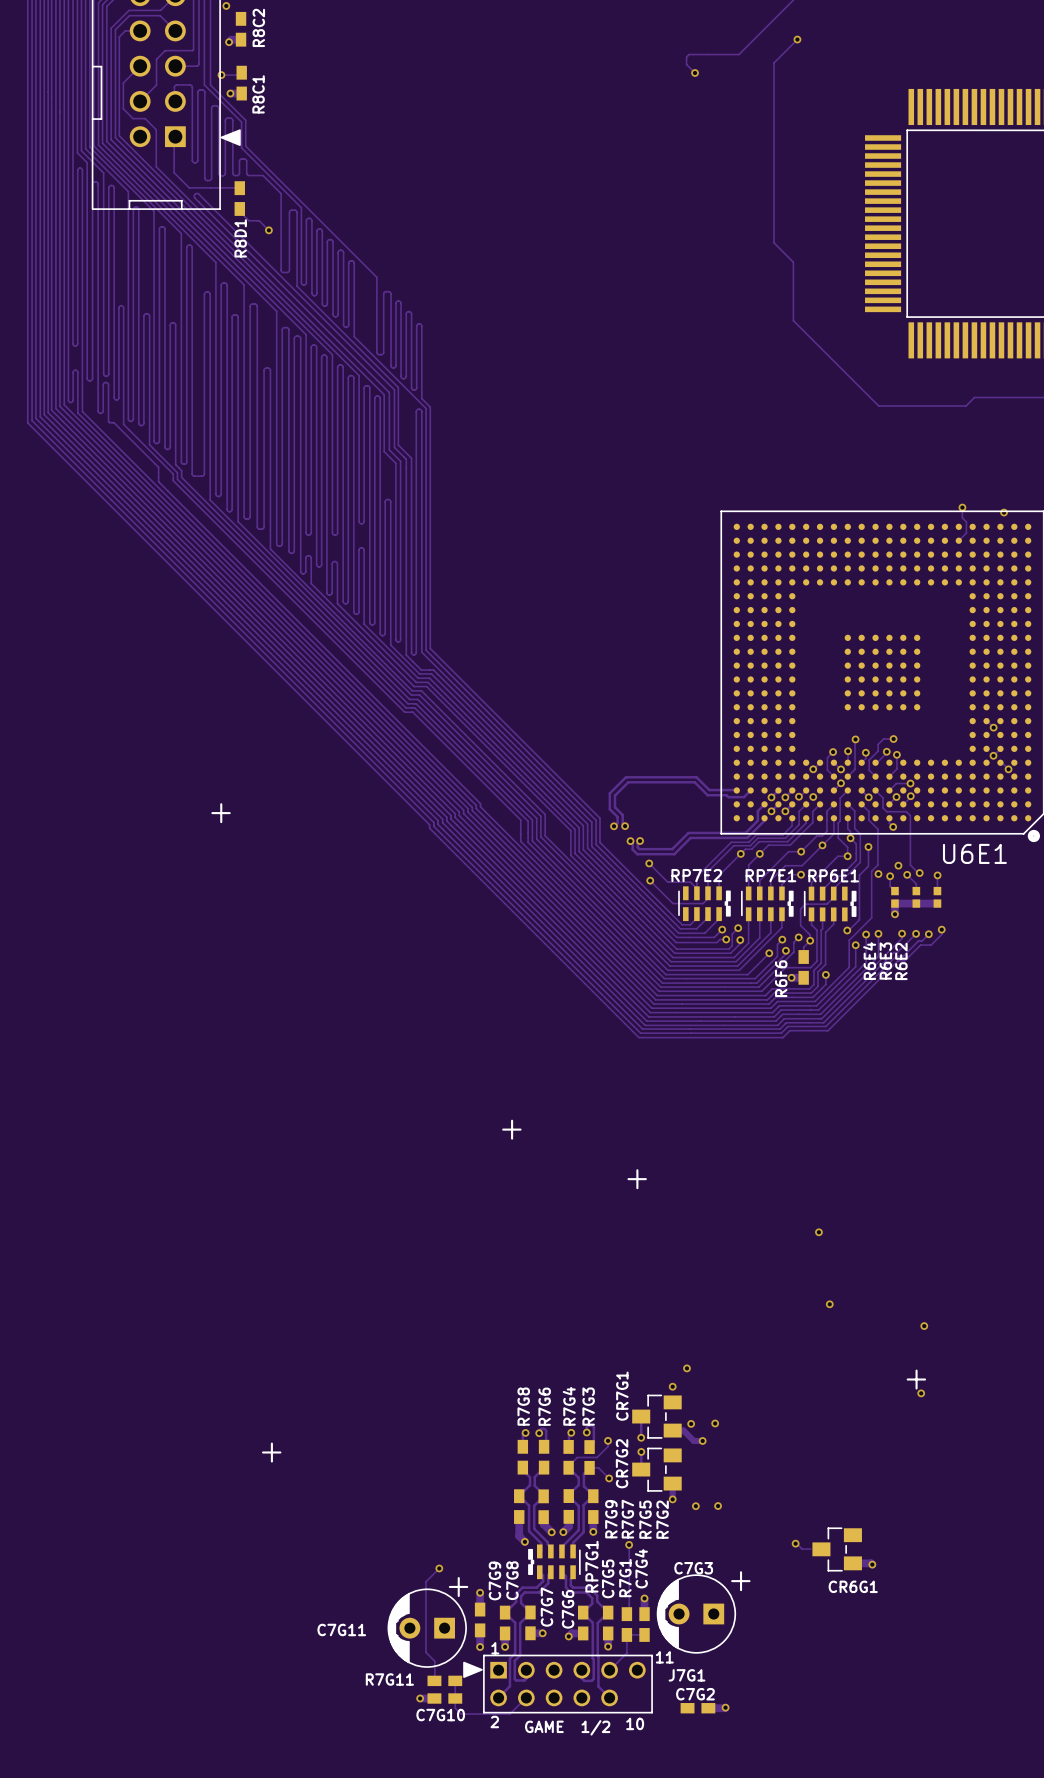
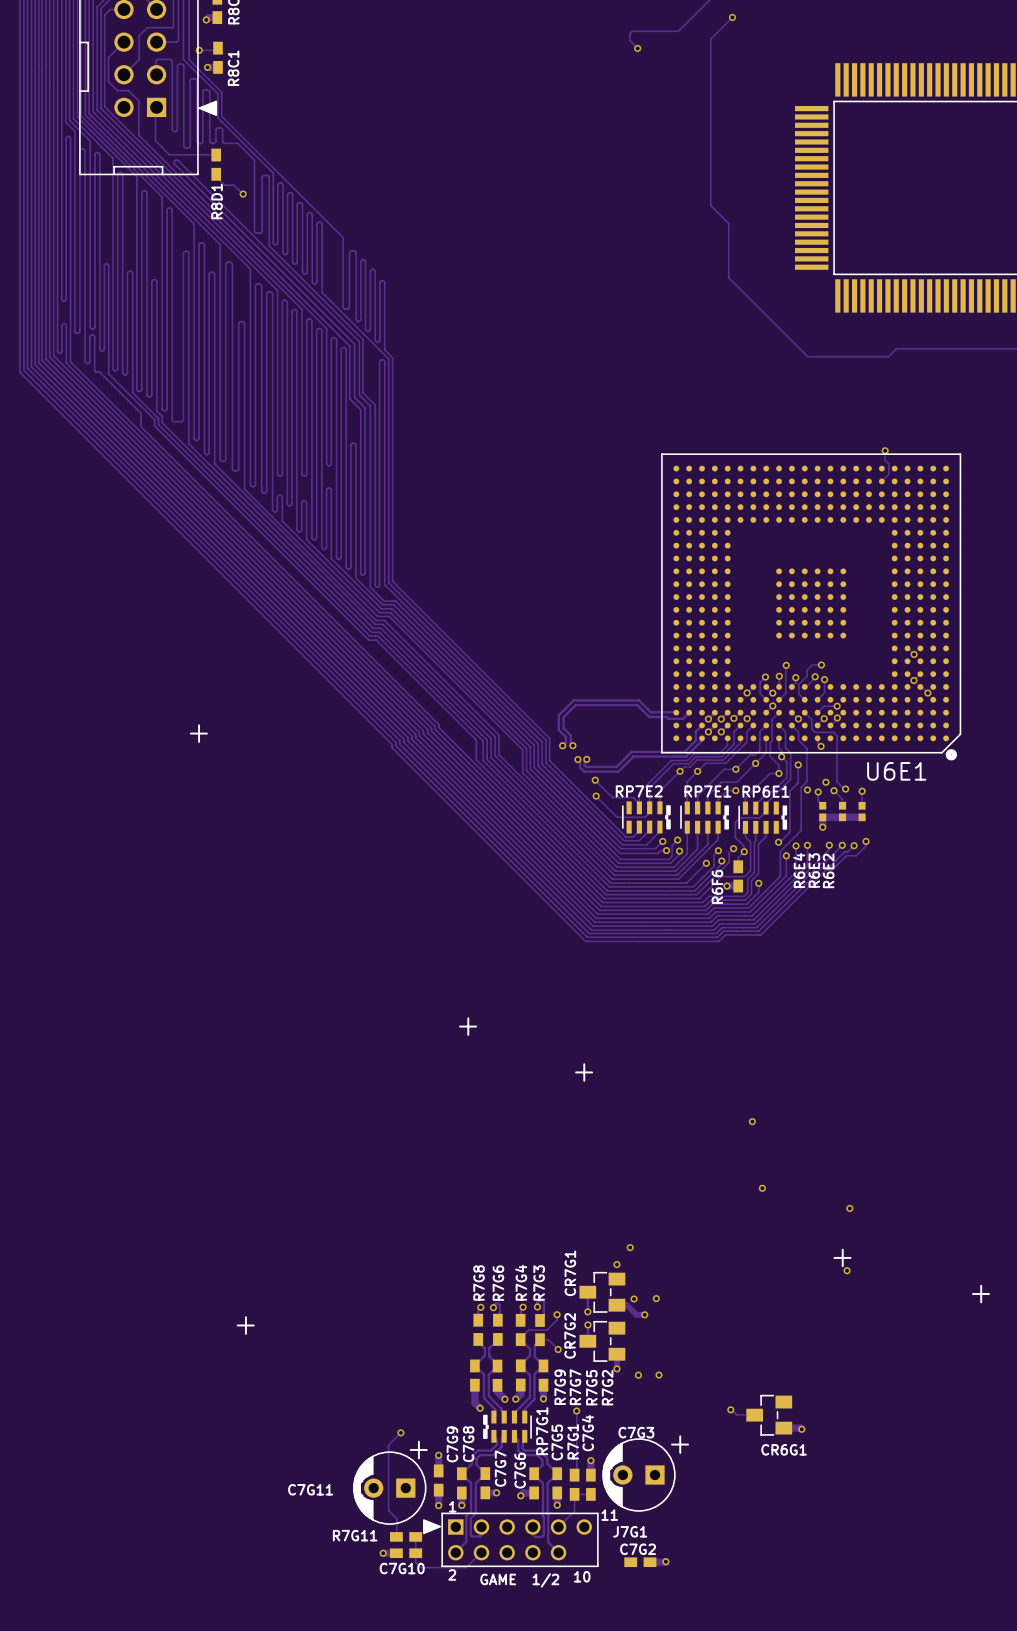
via: (1004, 512) -> none

